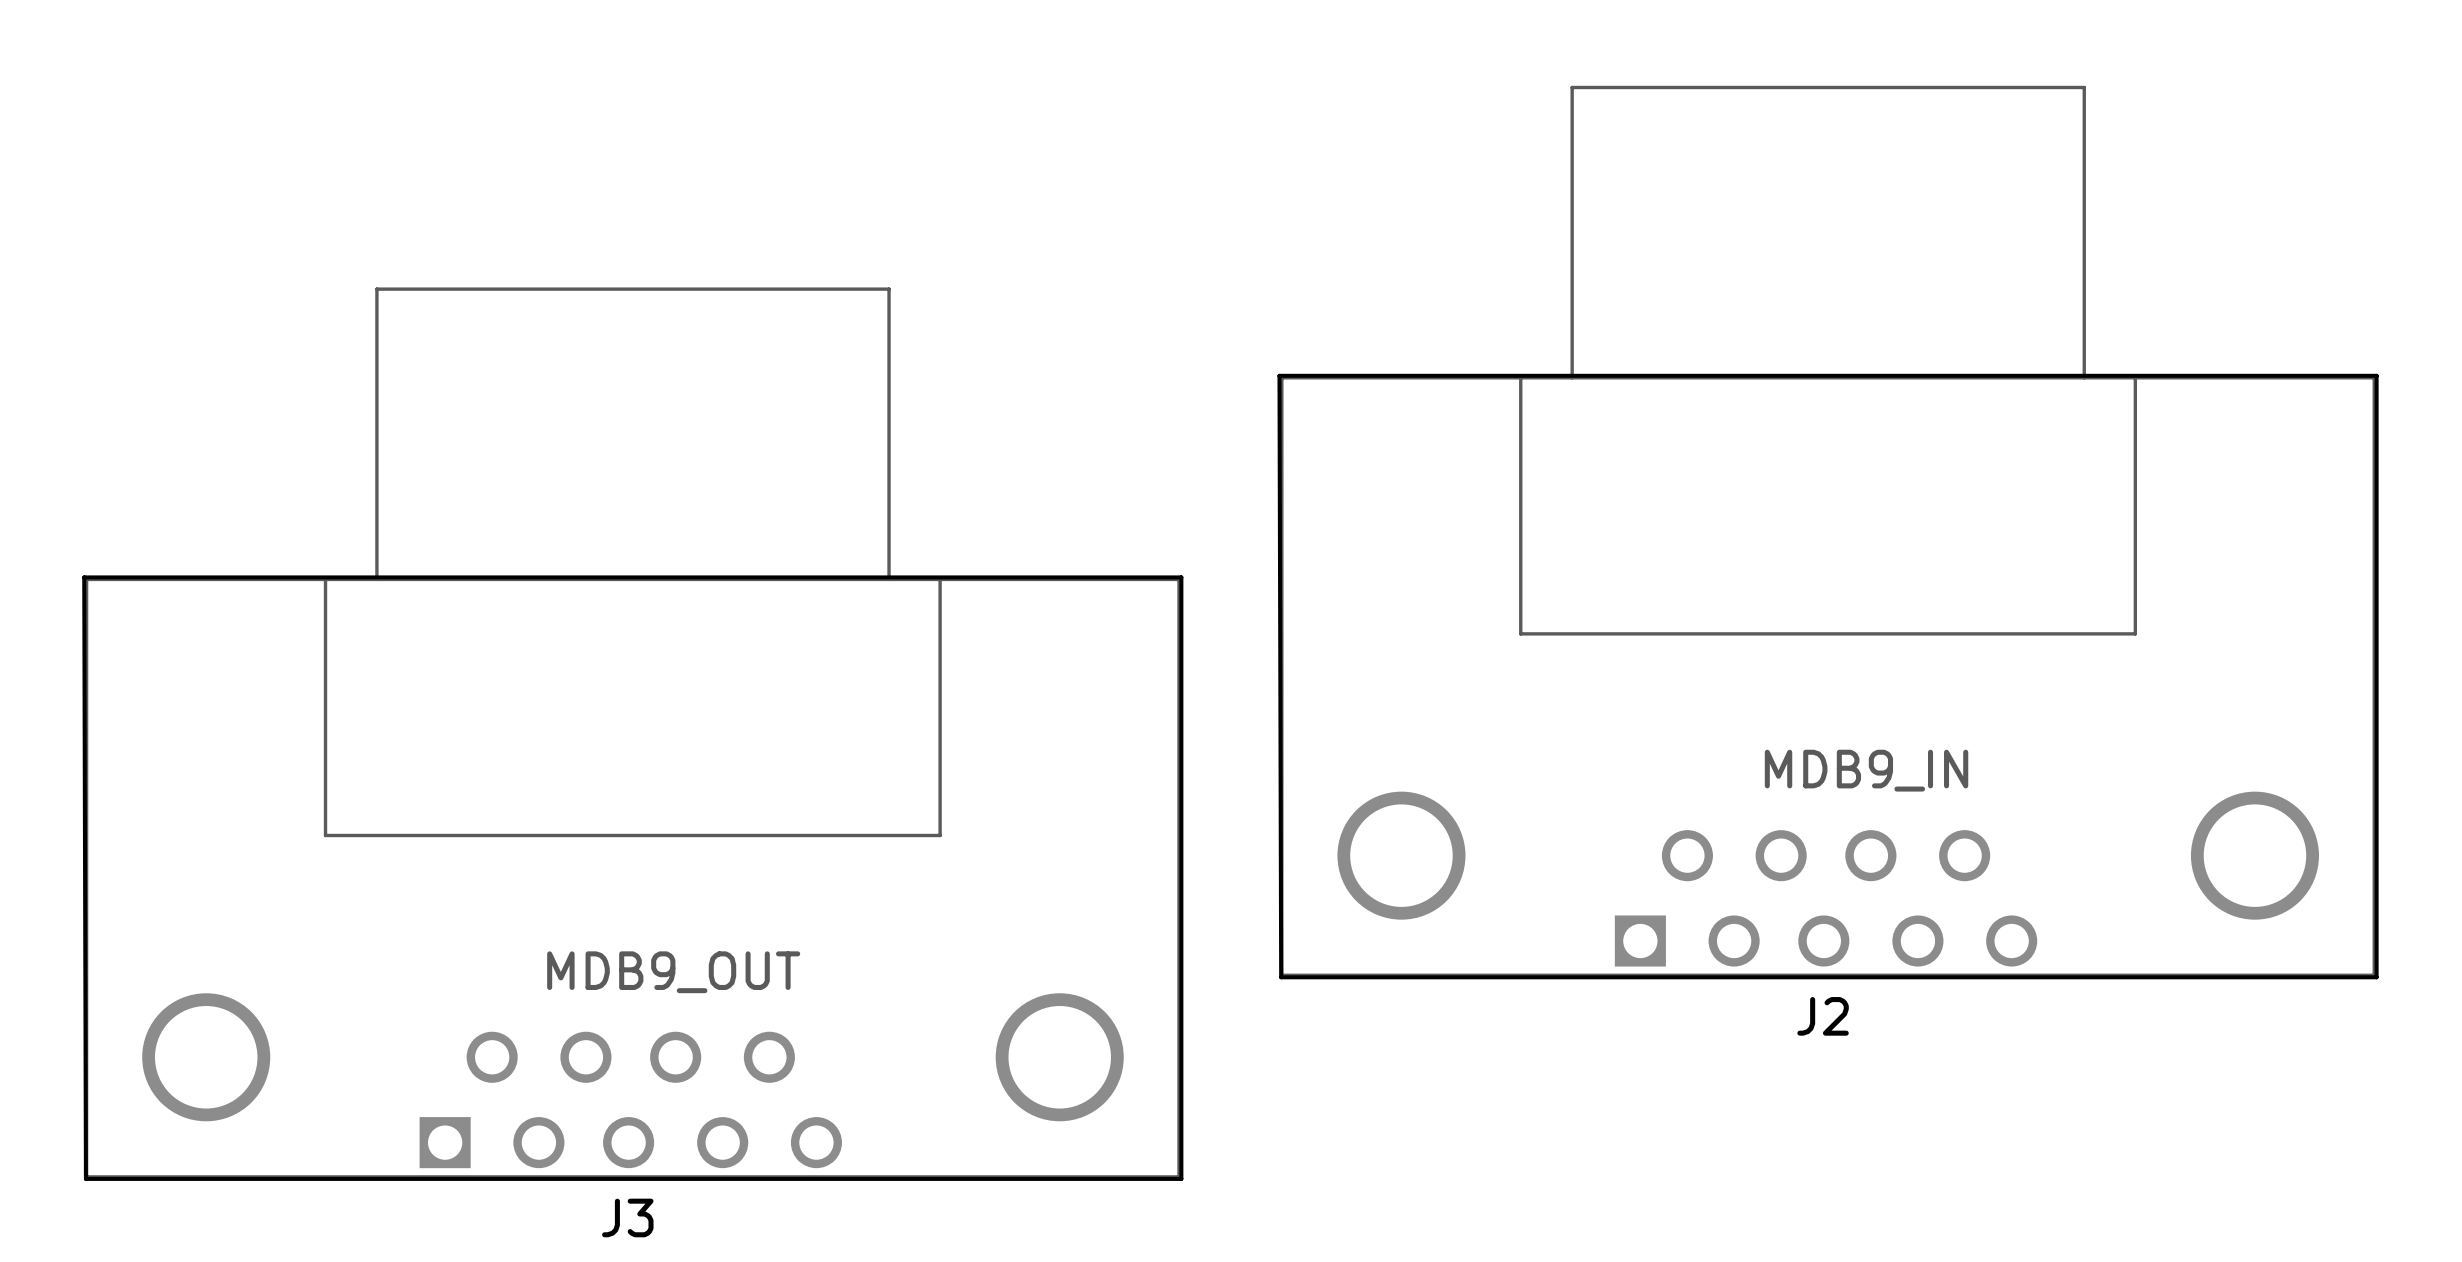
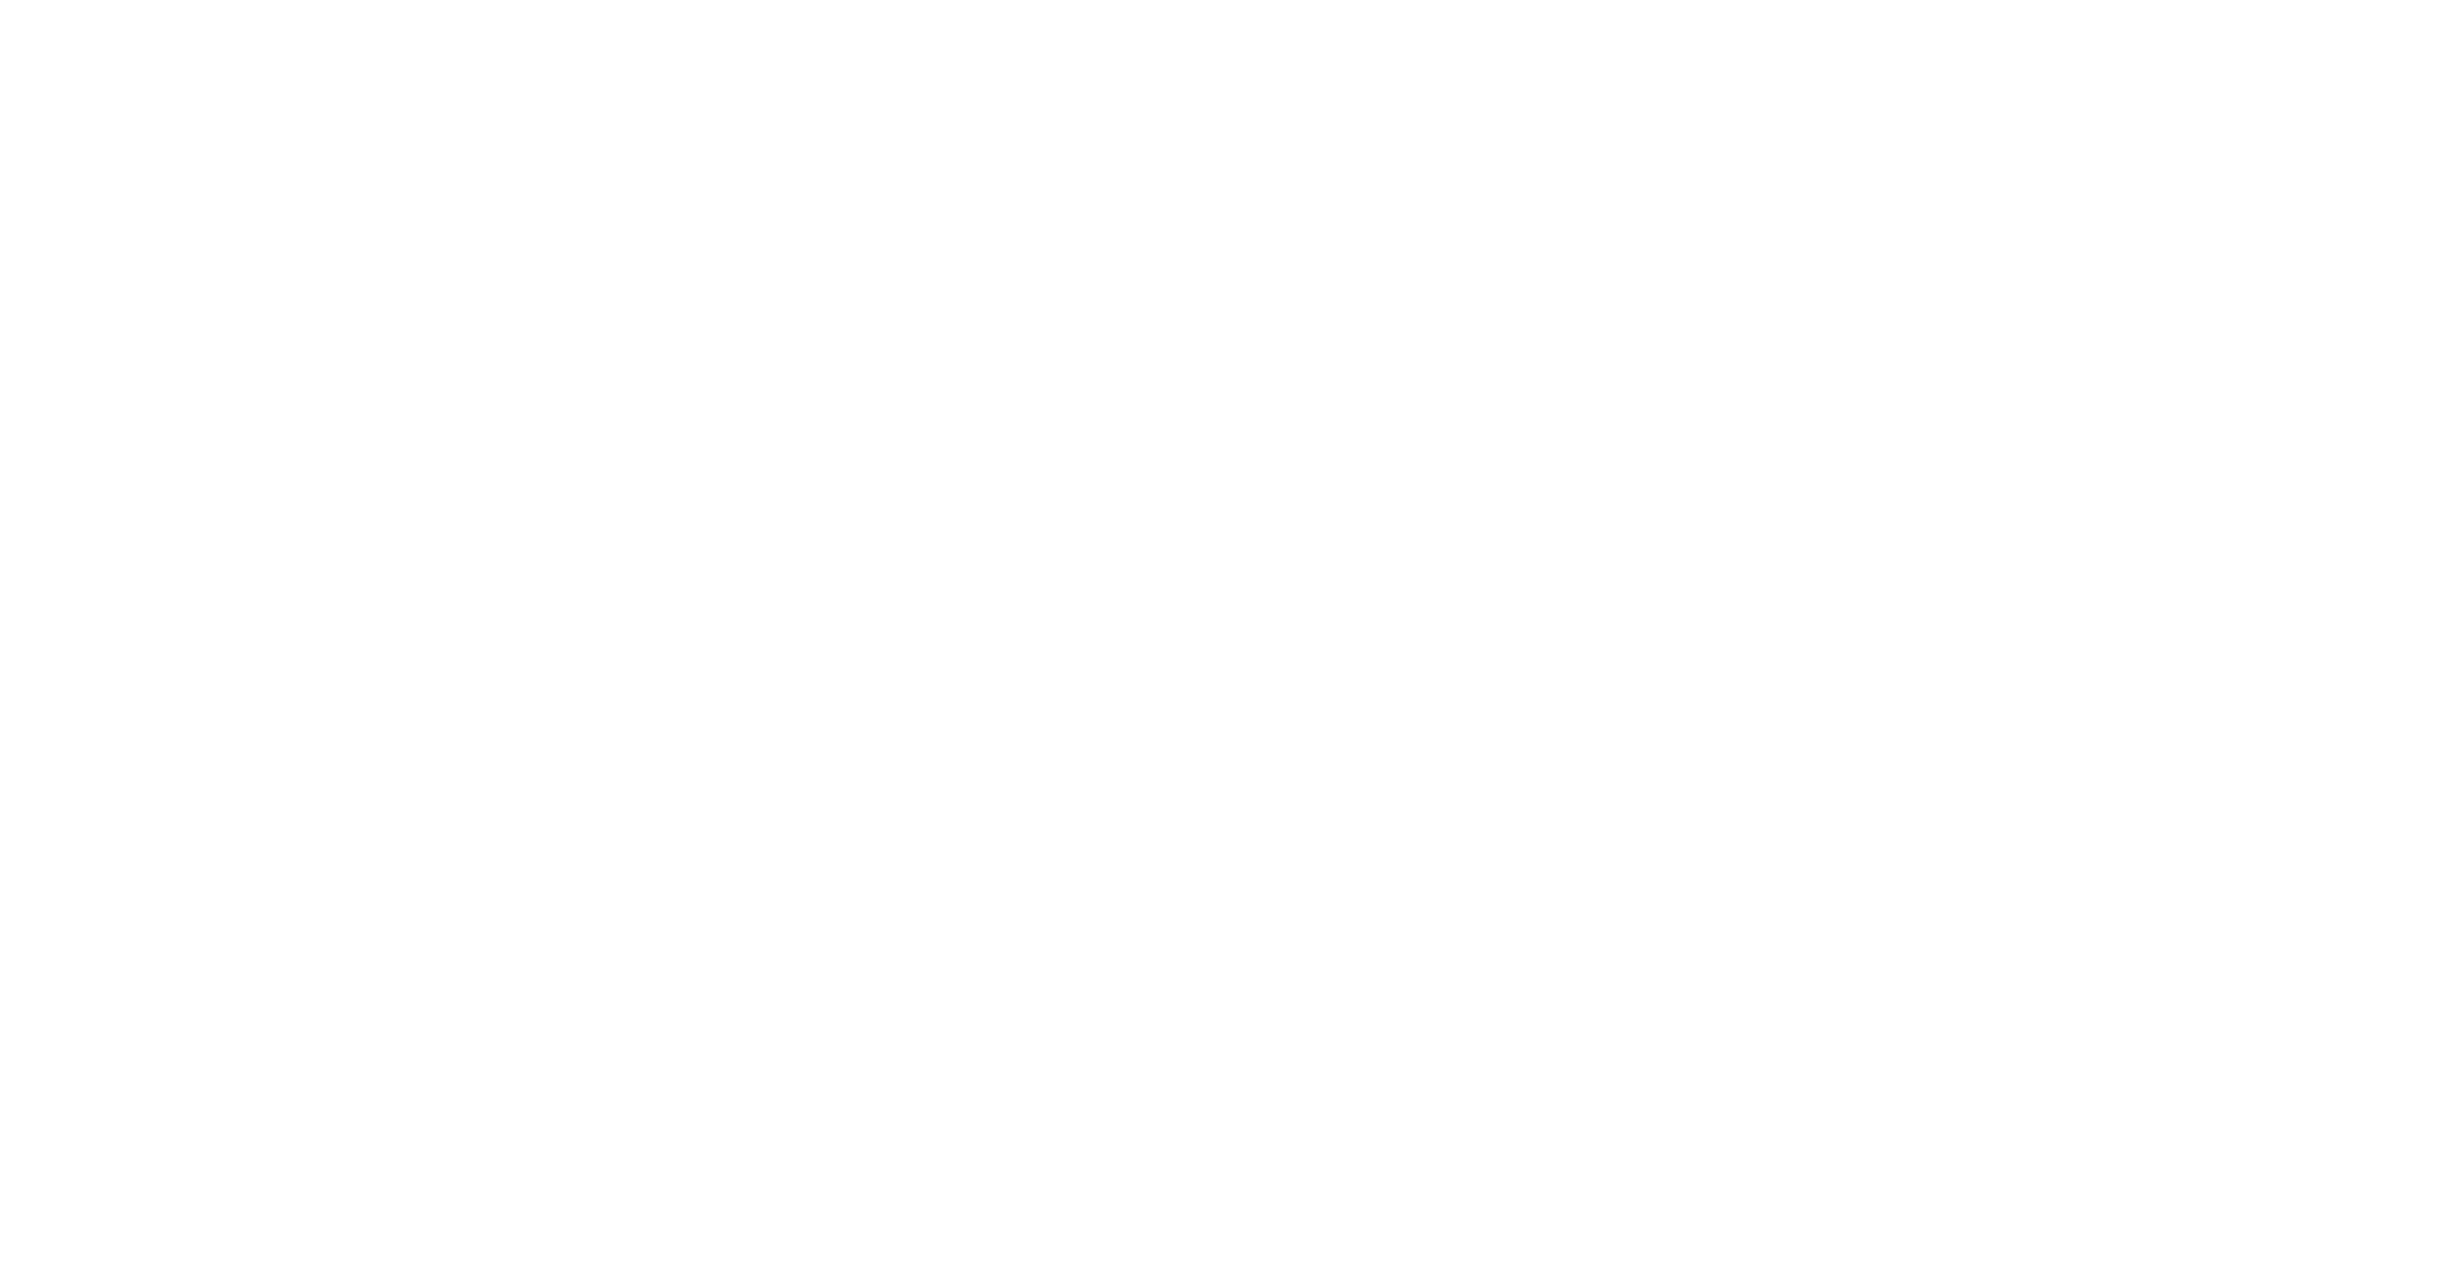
J2: MDB9_IN (1828, 532) -> none
J3: MDB9_OUT (632, 734) -> none

